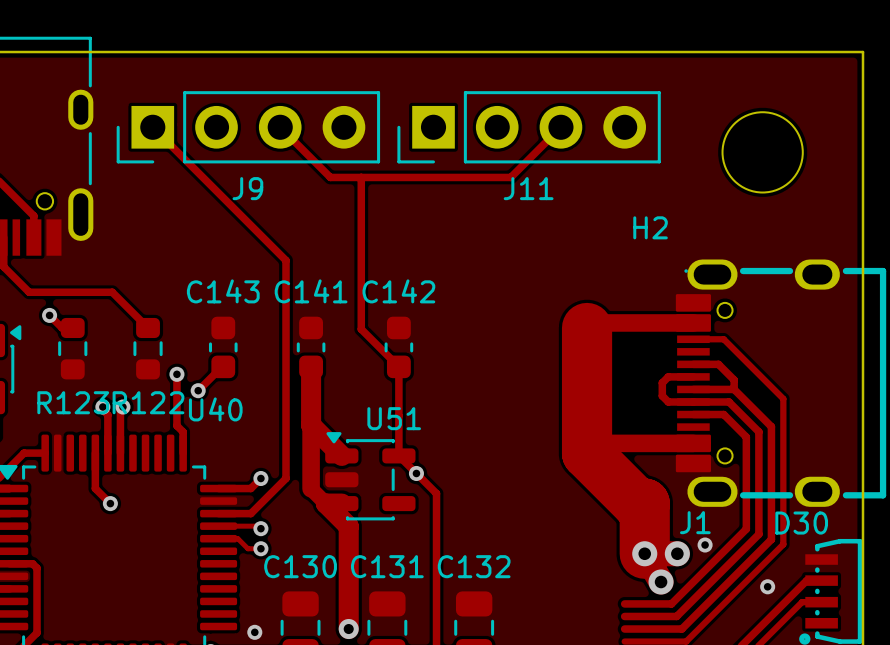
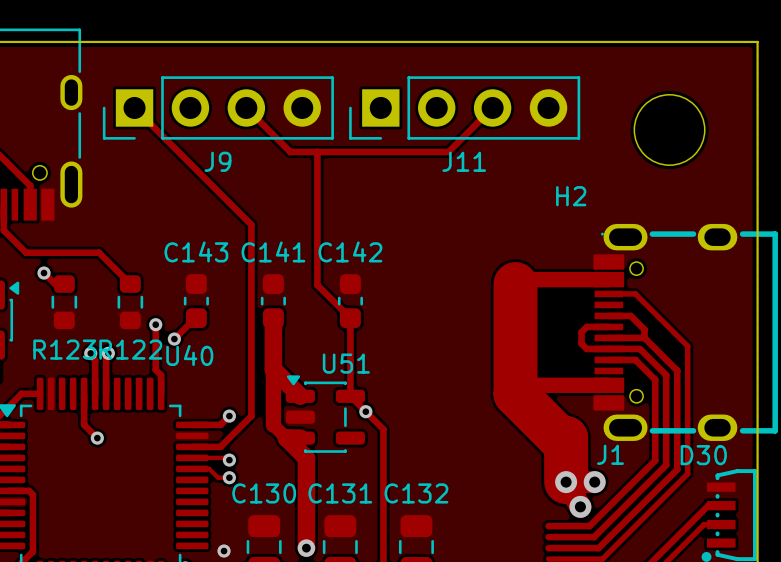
via: (705, 545) -> none
via: (767, 586) -> none

